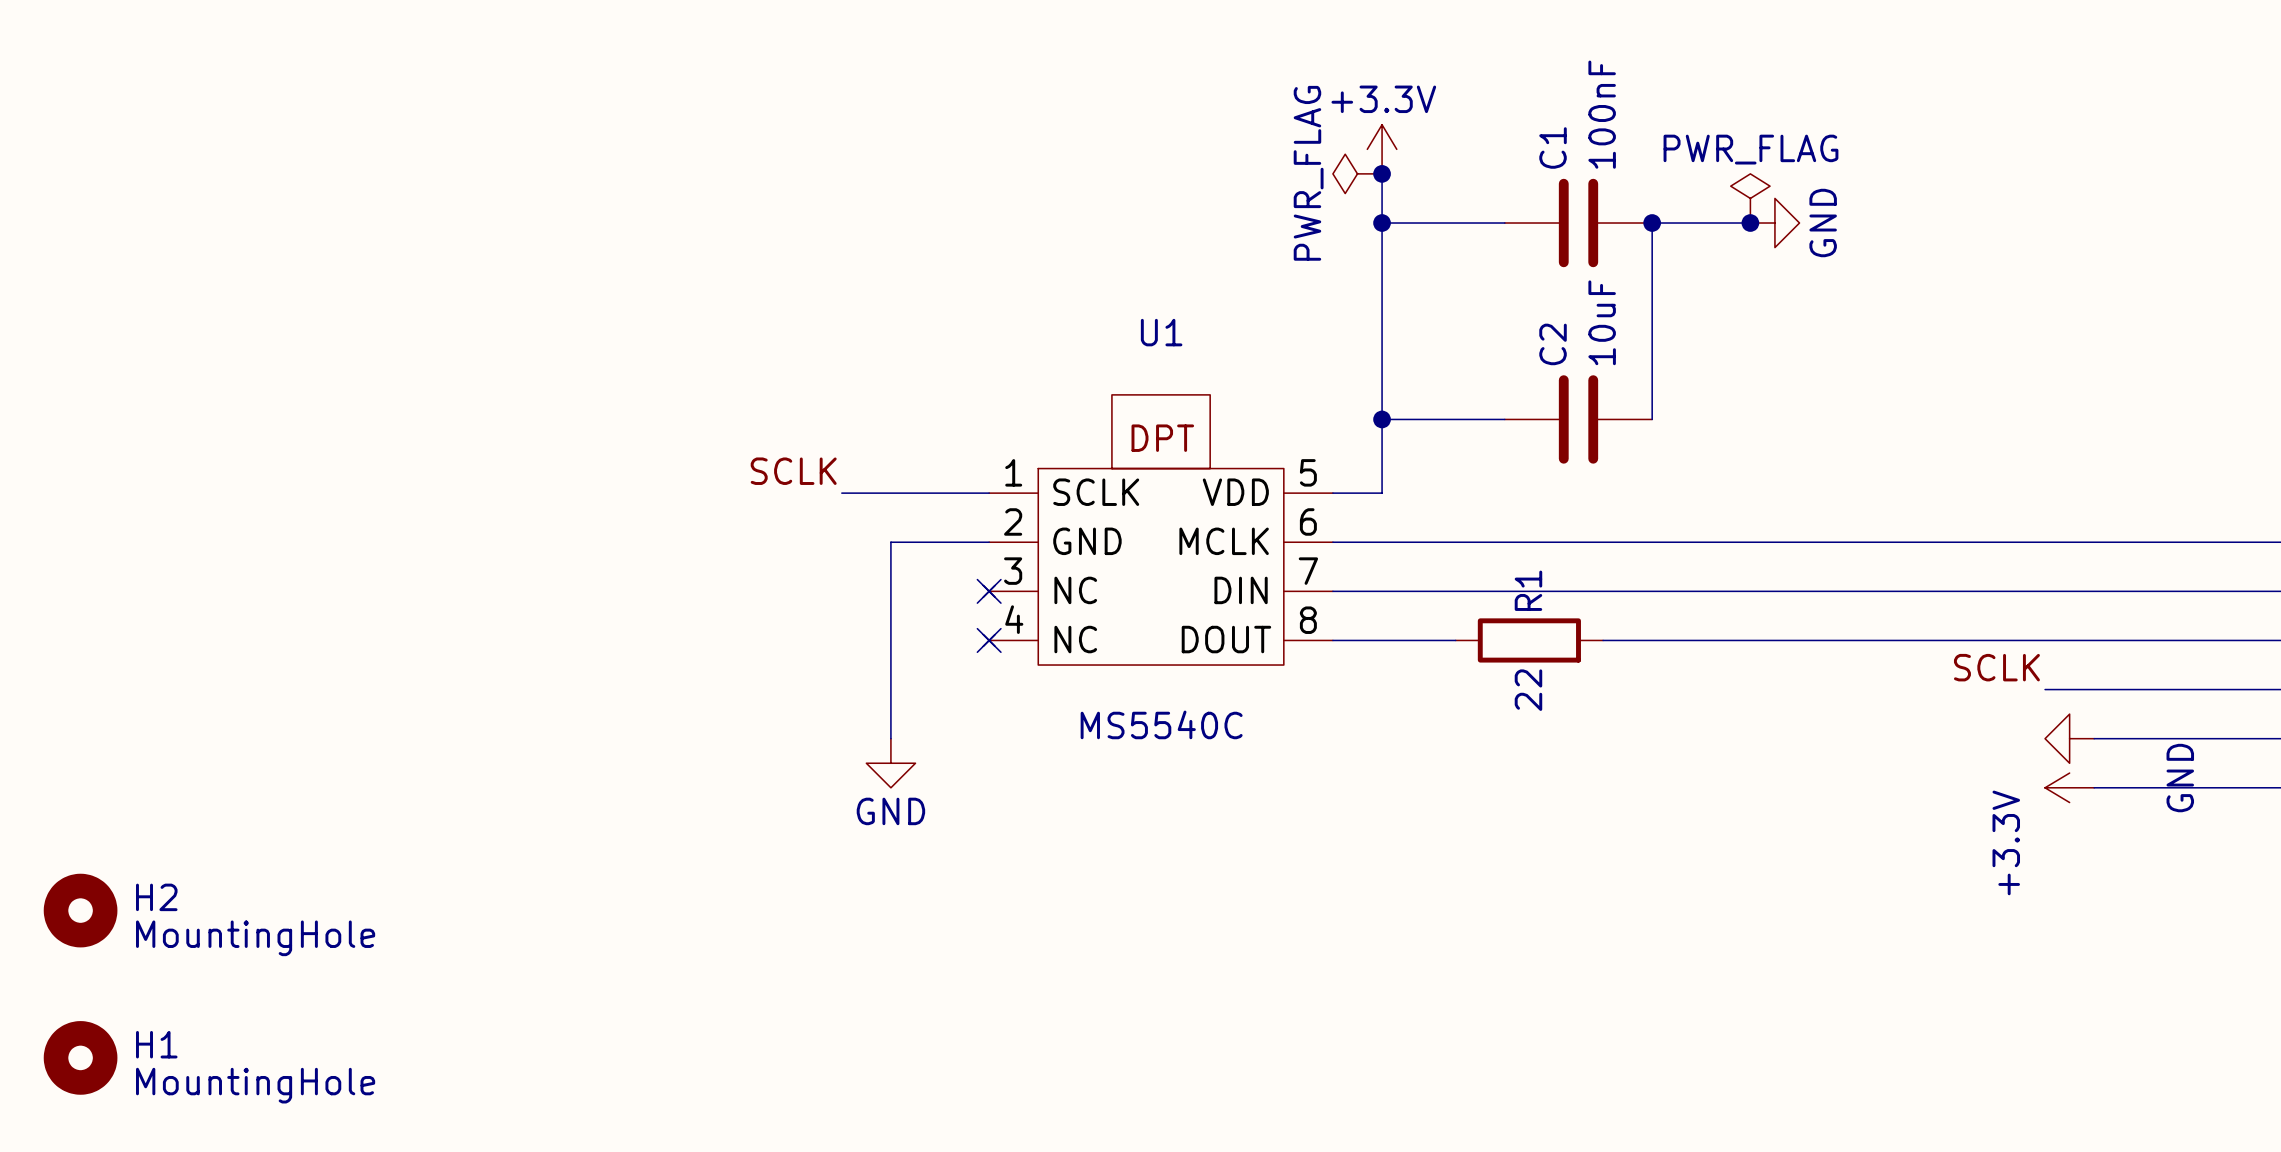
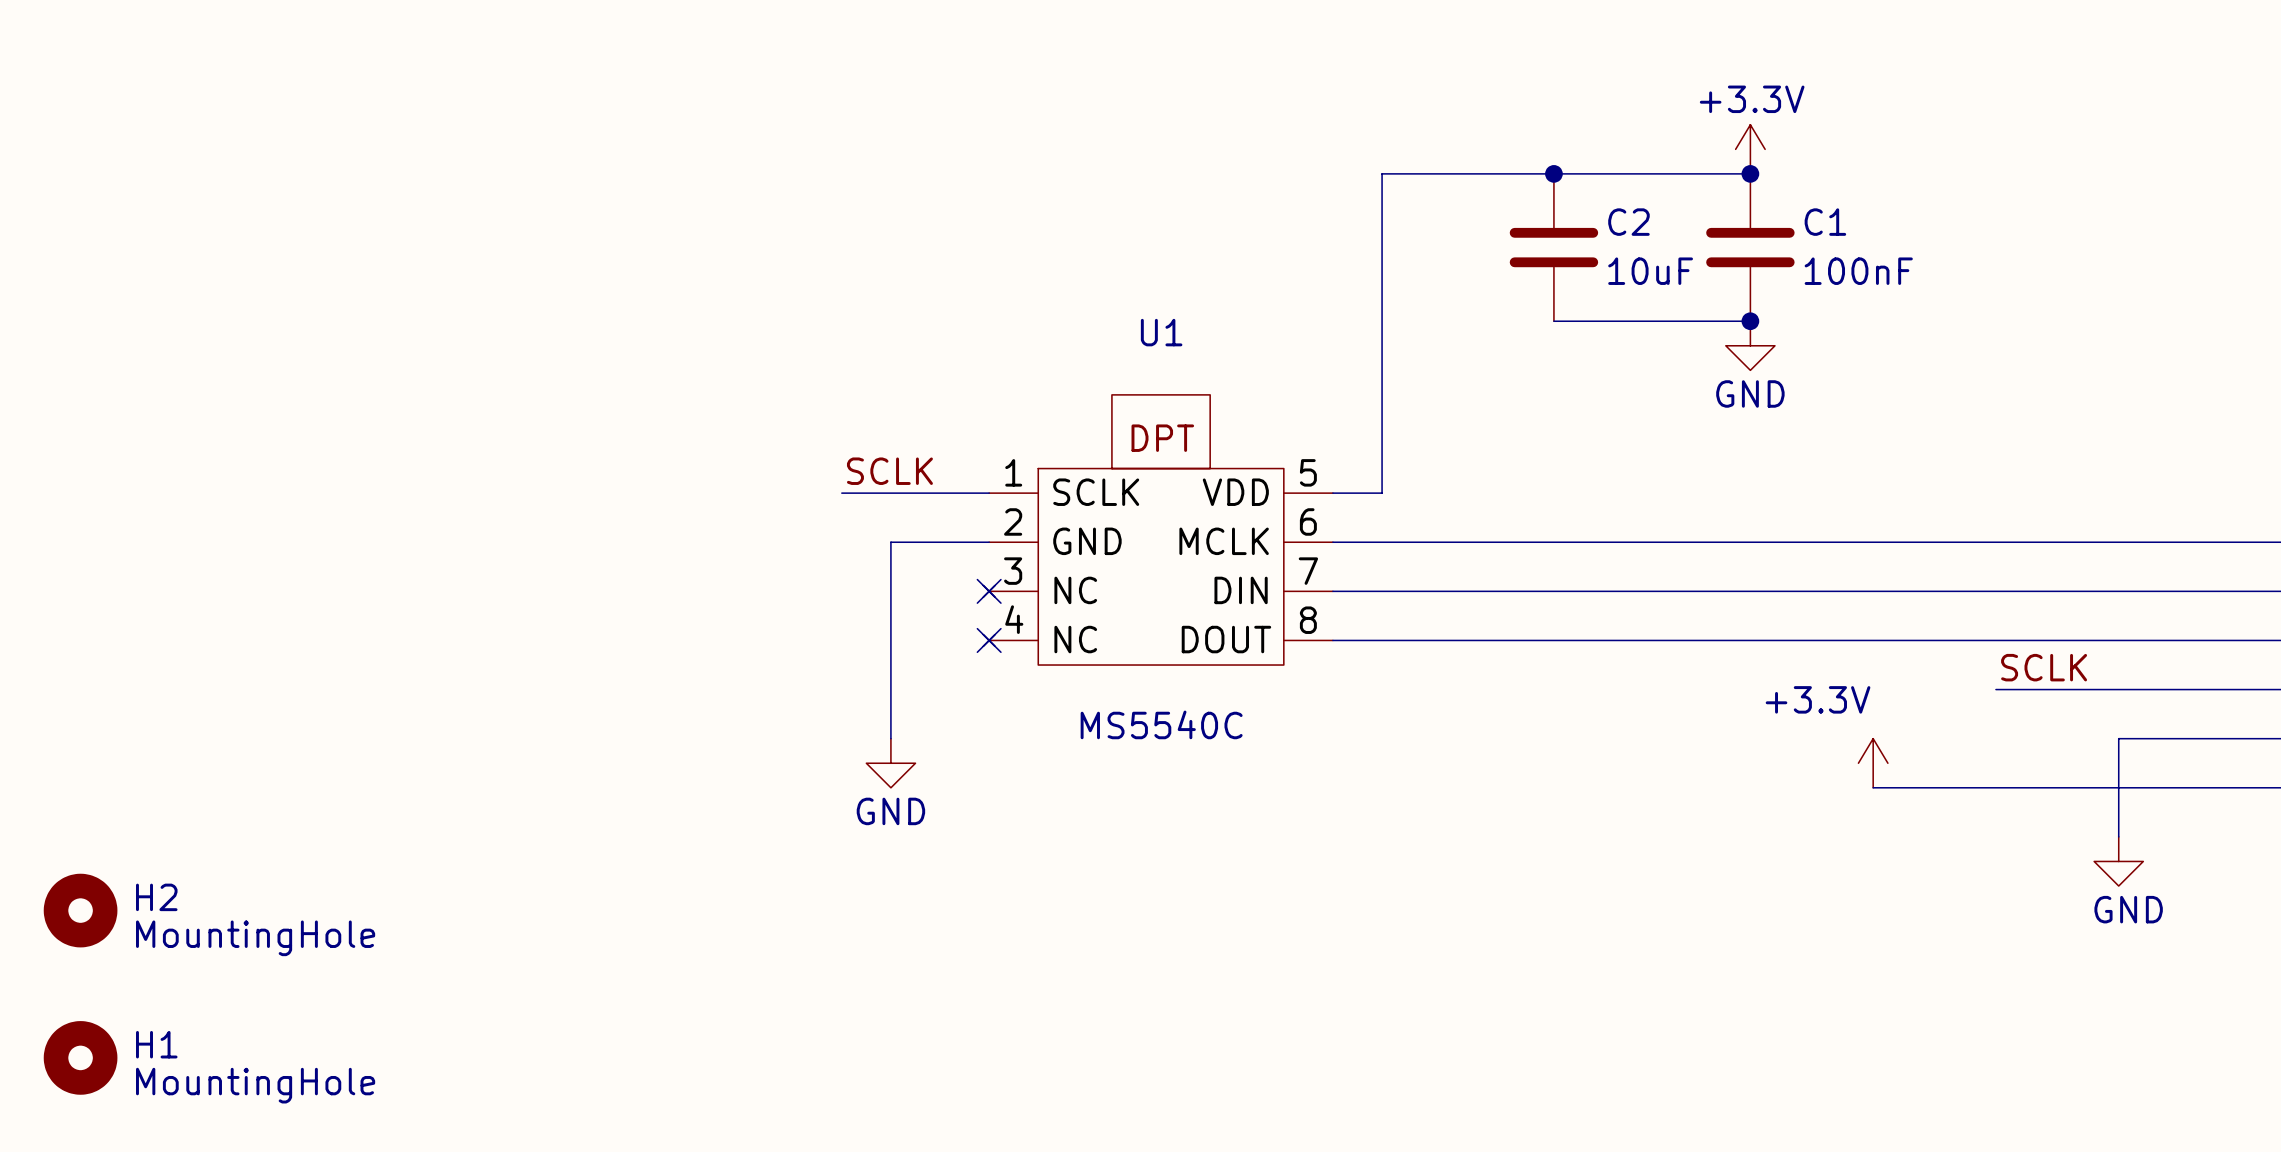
power symbol: +3.3V (1382, 149) -> none
power symbol: none -> +3.3V (1750, 149)
power symbol: PWR_FLAG (1357, 173) -> none
wire: none -> (1382, 173) (1750, 173)
junction: (1382, 173) -> none
junction: none -> (1553, 173)
junction: none -> (1750, 173)
power symbol: PWR_FLAG (1750, 198) -> none
wire: (1382, 223) (1504, 223) -> none
junction: (1382, 223) -> none
C1 rotation: 0° (1578, 223) -> 90° clockwise (1750, 247)
C1 position: (1578, 223) -> (1750, 247)
junction: (1652, 223) -> none
wire: (1750, 223) (1652, 223) (1652, 419) -> none
junction: (1750, 223) -> none
power symbol rotation: 0° (1774, 223) -> 90° clockwise (1750, 345)
power symbol position: GND (1774, 223) -> GND (1750, 345)
wire: none -> (1553, 321) (1750, 321)
junction: none -> (1750, 321)
wire: (1382, 419) (1504, 419) -> none
junction: (1382, 419) -> none
C2 rotation: 0° (1578, 419) -> 90° clockwise (1553, 247)
C2 position: (1578, 419) -> (1553, 247)
label position: SCLK (793, 471) -> SCLK (889, 471)
wire: none -> (1455, 640) (1603, 640)
R1: 22 (1529, 640) -> none
label position: SCLK (1996, 667) -> SCLK (2044, 667)
wire: none -> (1995, 689) (2045, 689)
power symbol rotation: 0° (2069, 738) -> 90° counterclockwise (2118, 861)
power symbol position: GND (2069, 738) -> GND (2118, 861)
wire: (2094, 738) (2118, 738) -> (2118, 836) (2118, 738)
power symbol text position: GND (2180, 778) -> GND (2128, 909)
wire: none -> (1873, 787) (2094, 787)
power symbol rotation: 0° (2069, 787) -> 90° clockwise (1873, 763)
power symbol position: +3.3V (2069, 787) -> +3.3V (1873, 763)

